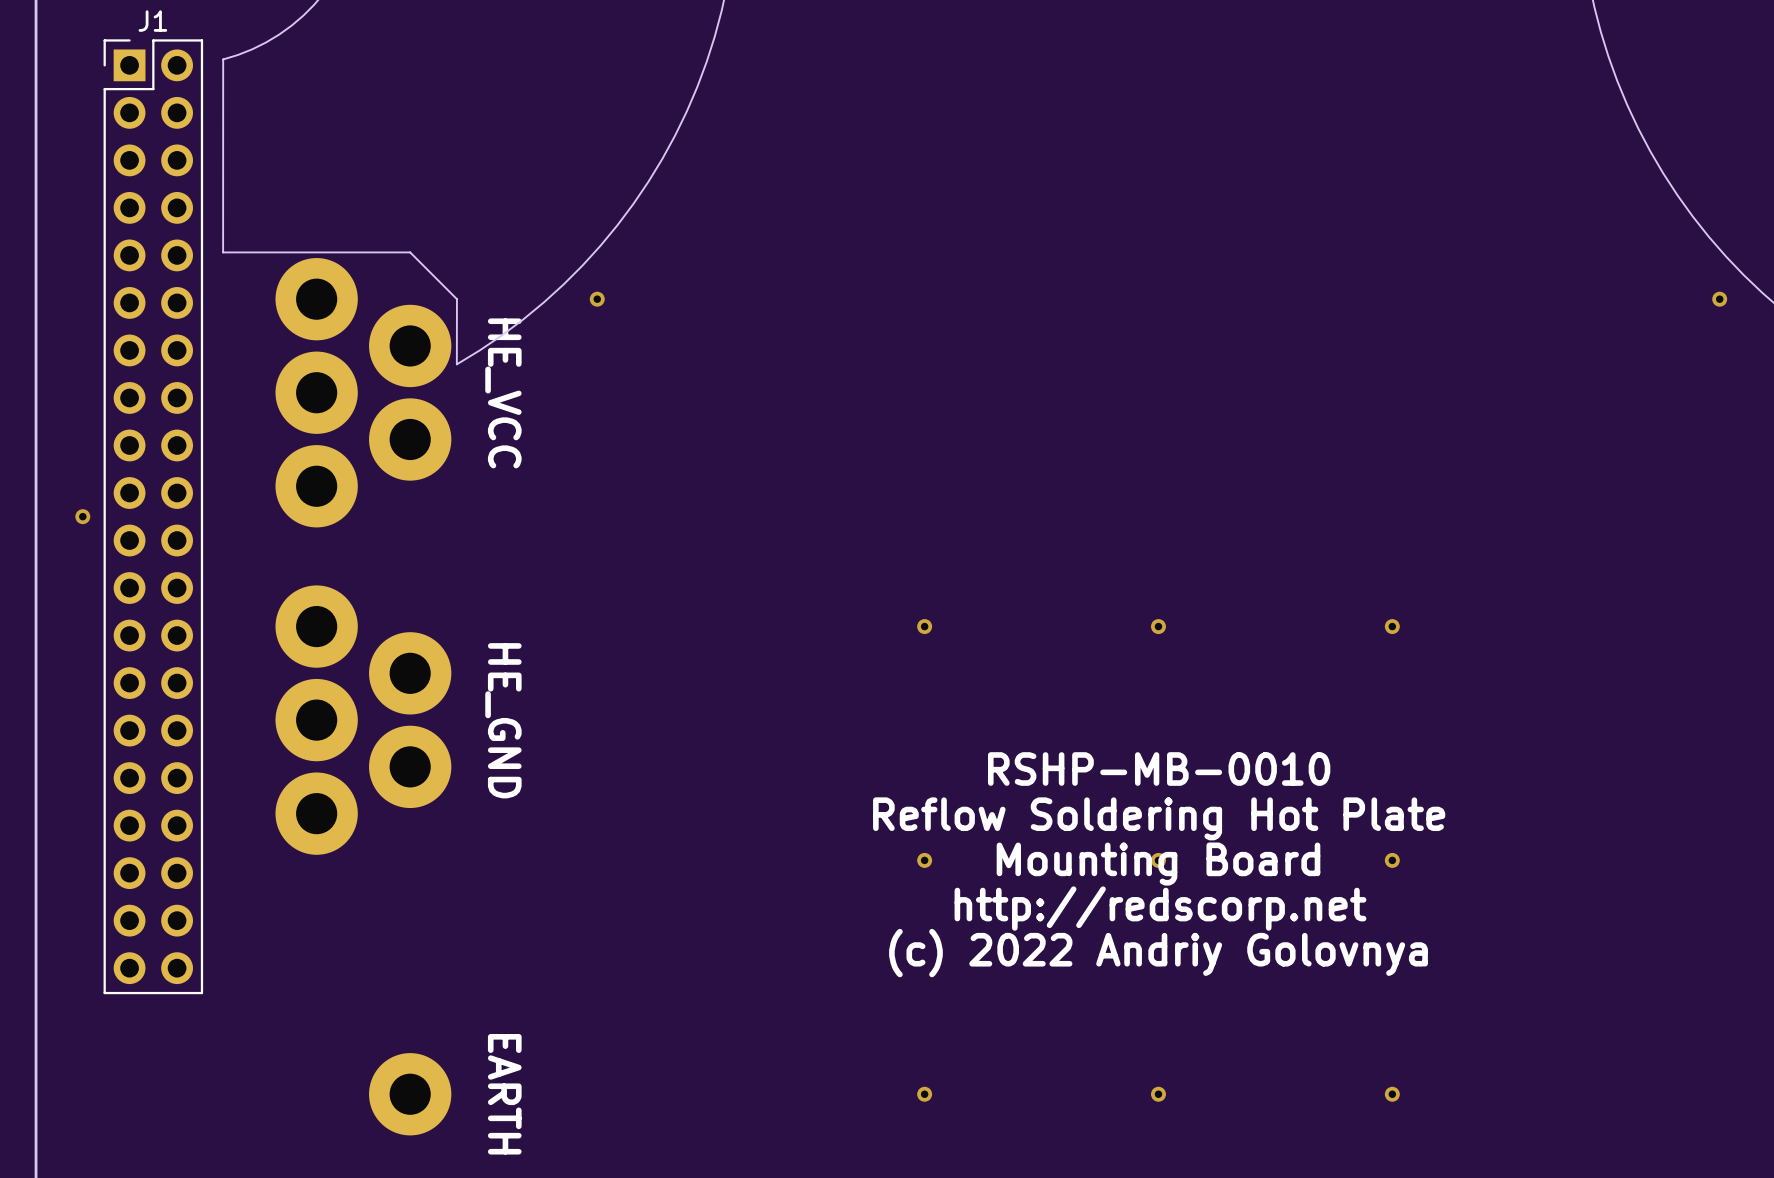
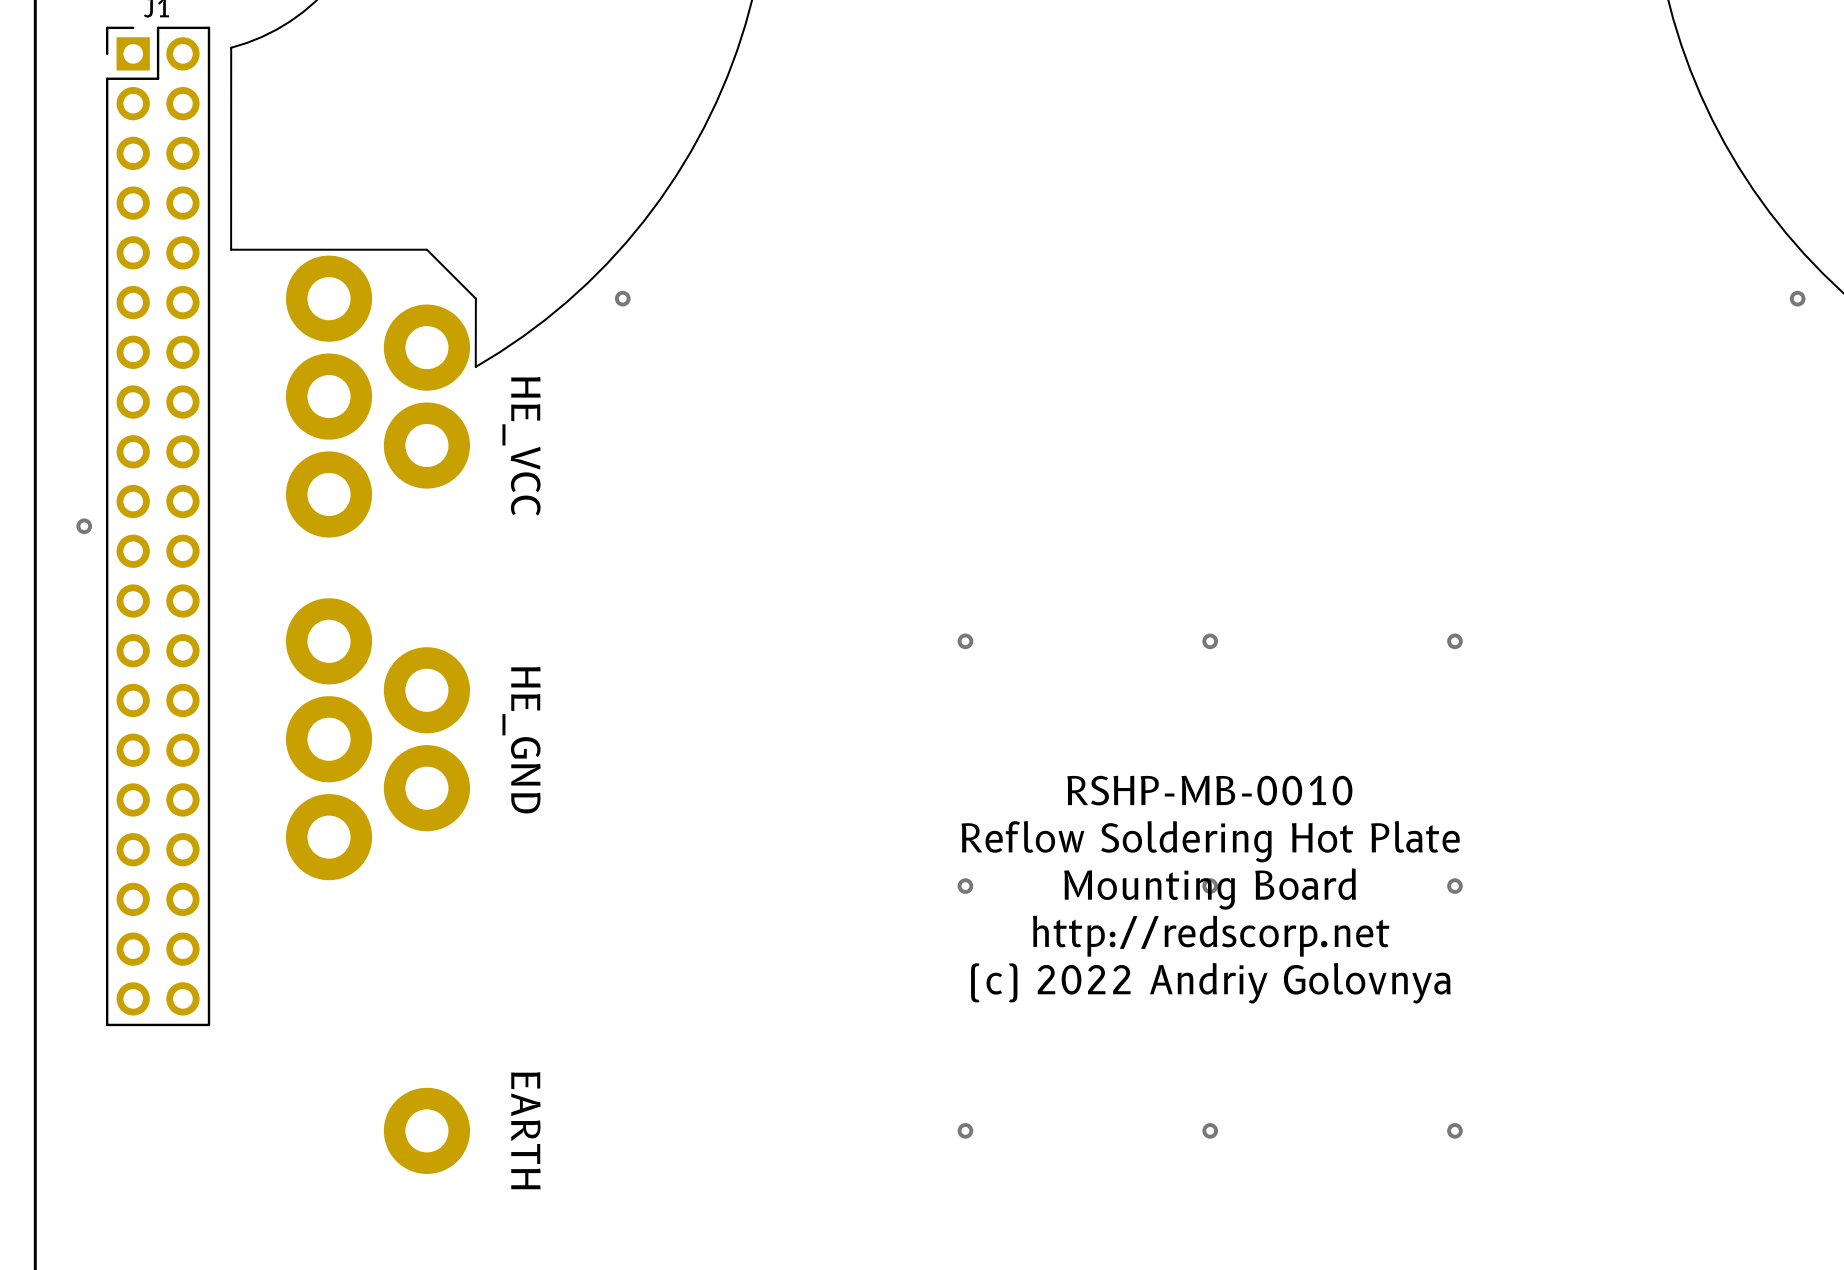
text position: HE_VCC (503, 393) -> HE_VCC (521, 446)

